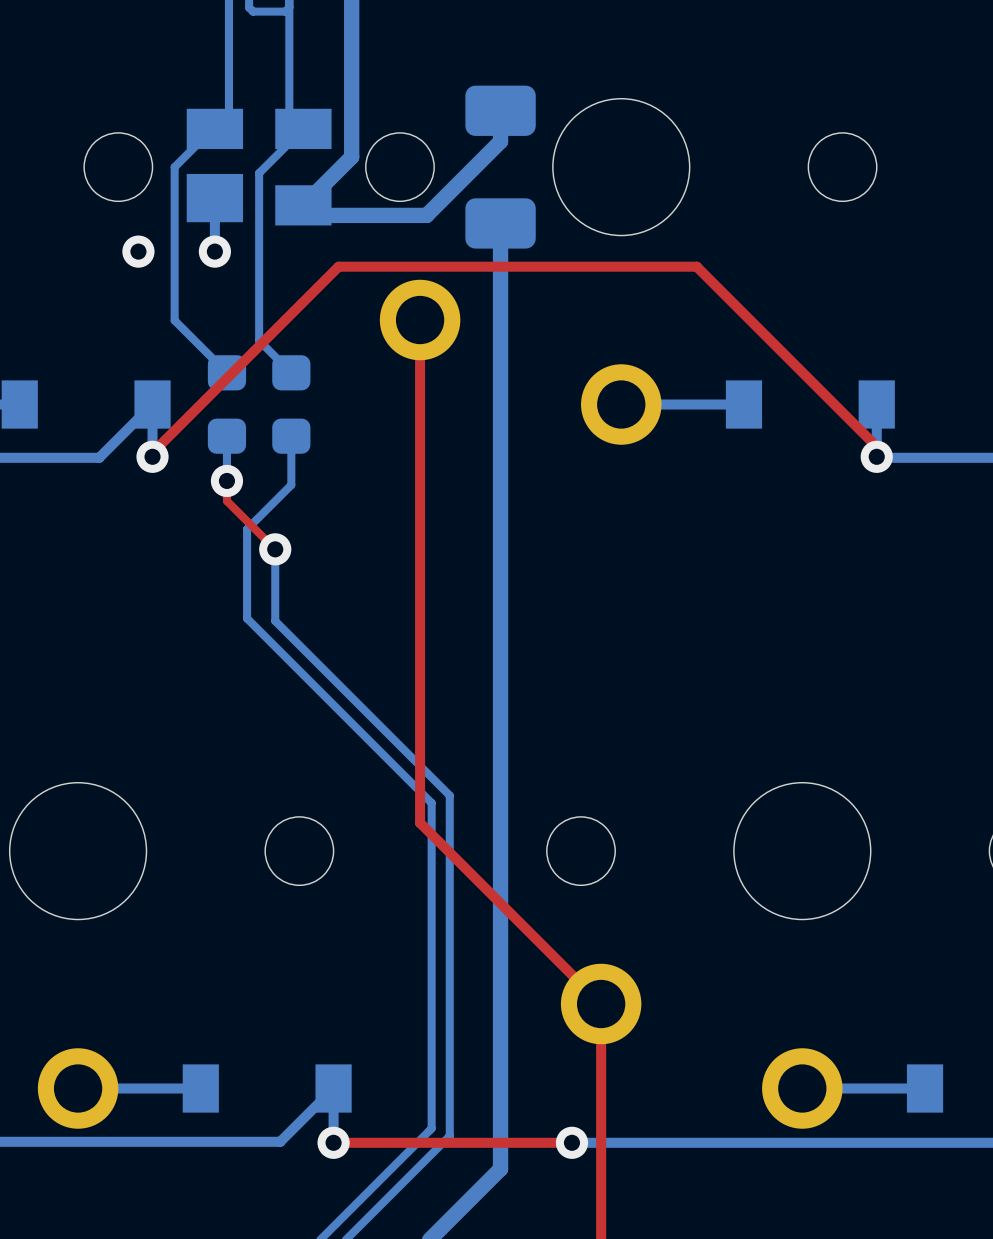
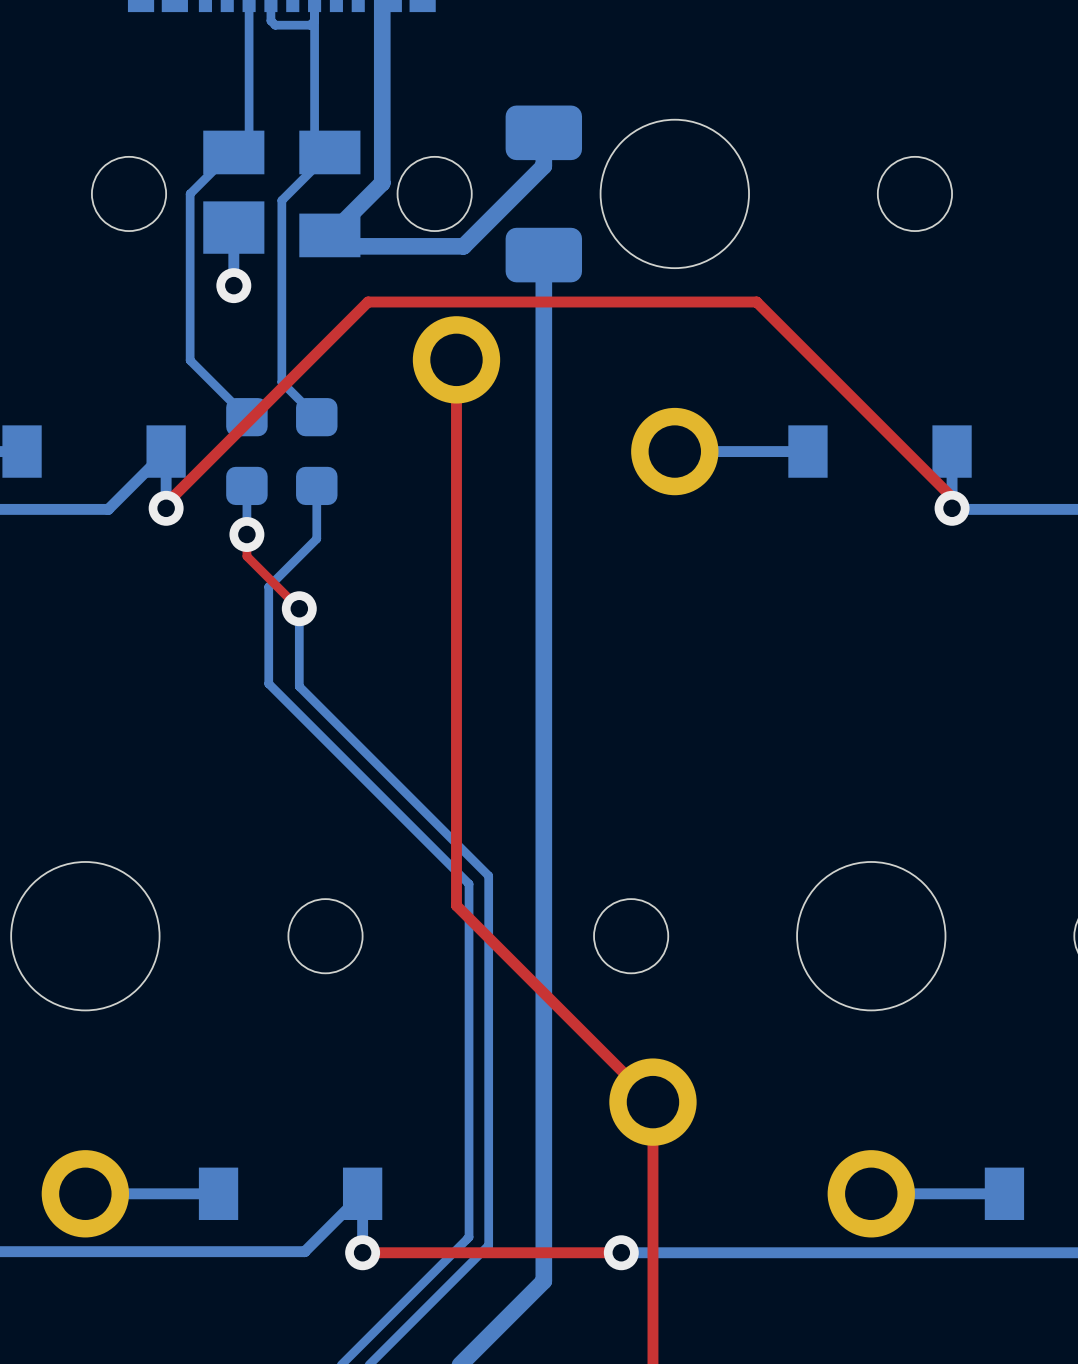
via: (138, 251) -> none

